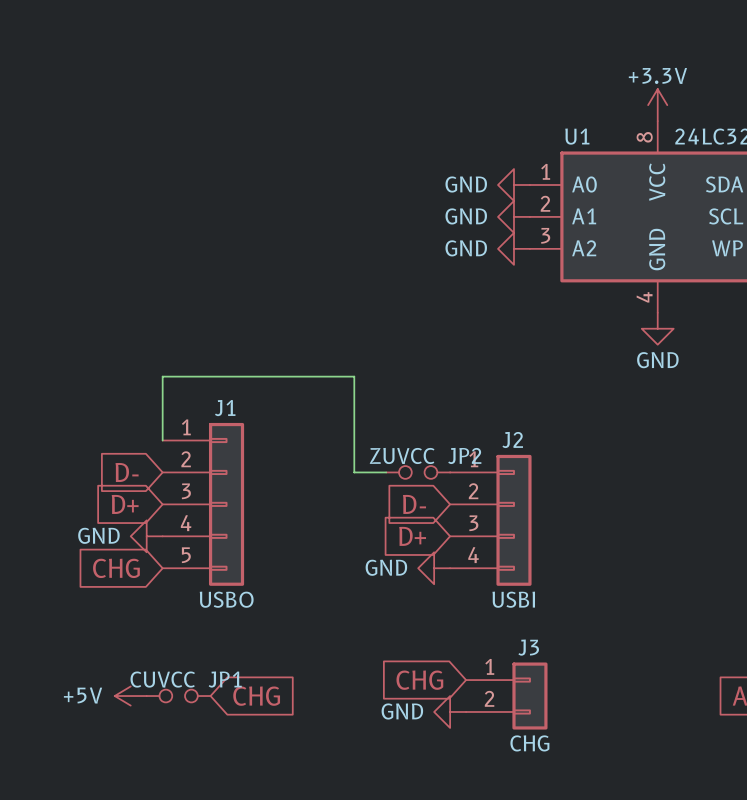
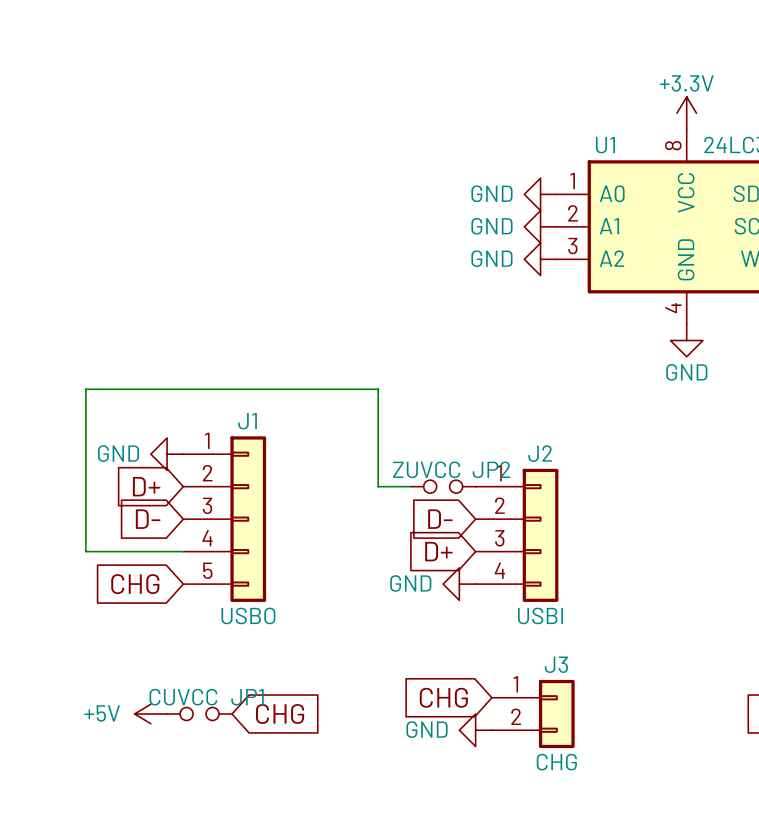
wire: (162, 376) (162, 440) -> (183, 389) (85, 389) (85, 551) (183, 551)
global label: D- (127, 472) -> D+ (146, 486)
global label: D+ (125, 504) -> D- (148, 519)
power symbol position: GND (146, 536) -> GND (167, 454)

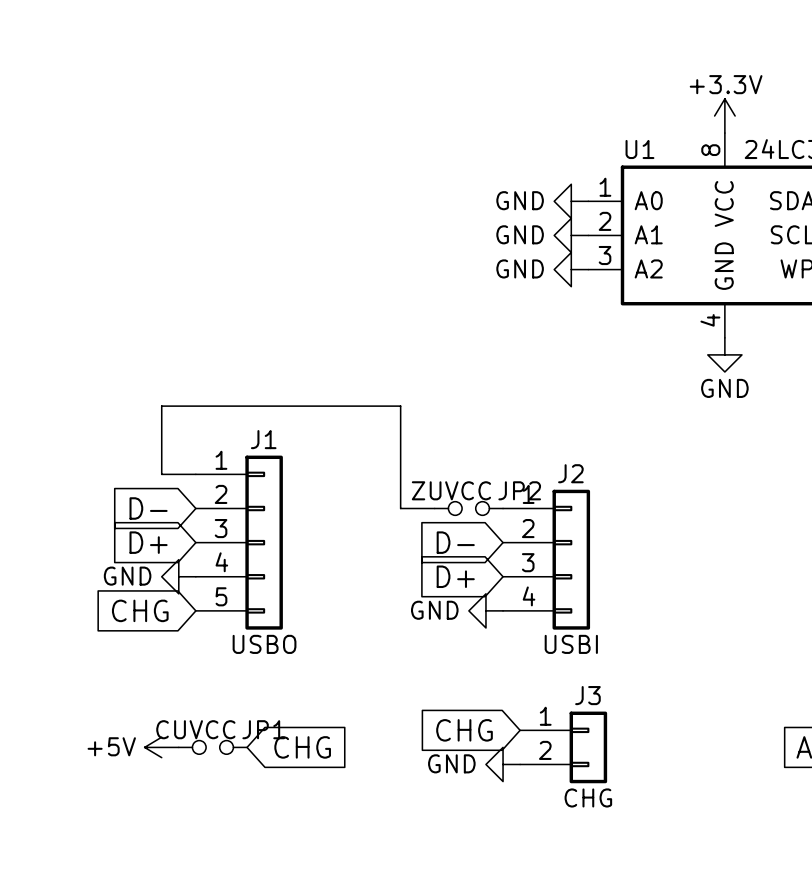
wire: (150, 389) (85, 389) (85, 551) (183, 551) -> (161, 406) (161, 474) (195, 474)
power symbol position: GND (167, 454) -> GND (178, 576)
global label: D+ (146, 486) -> D- (148, 508)
global label: D- (148, 519) -> D+ (148, 542)

